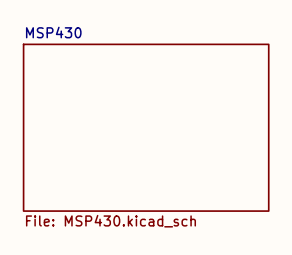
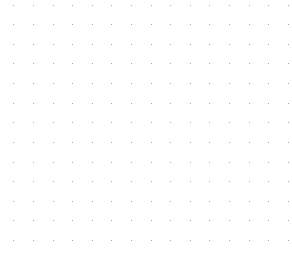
sheet MSP430: File: MSP430.kicad_sch (146, 127) -> none

